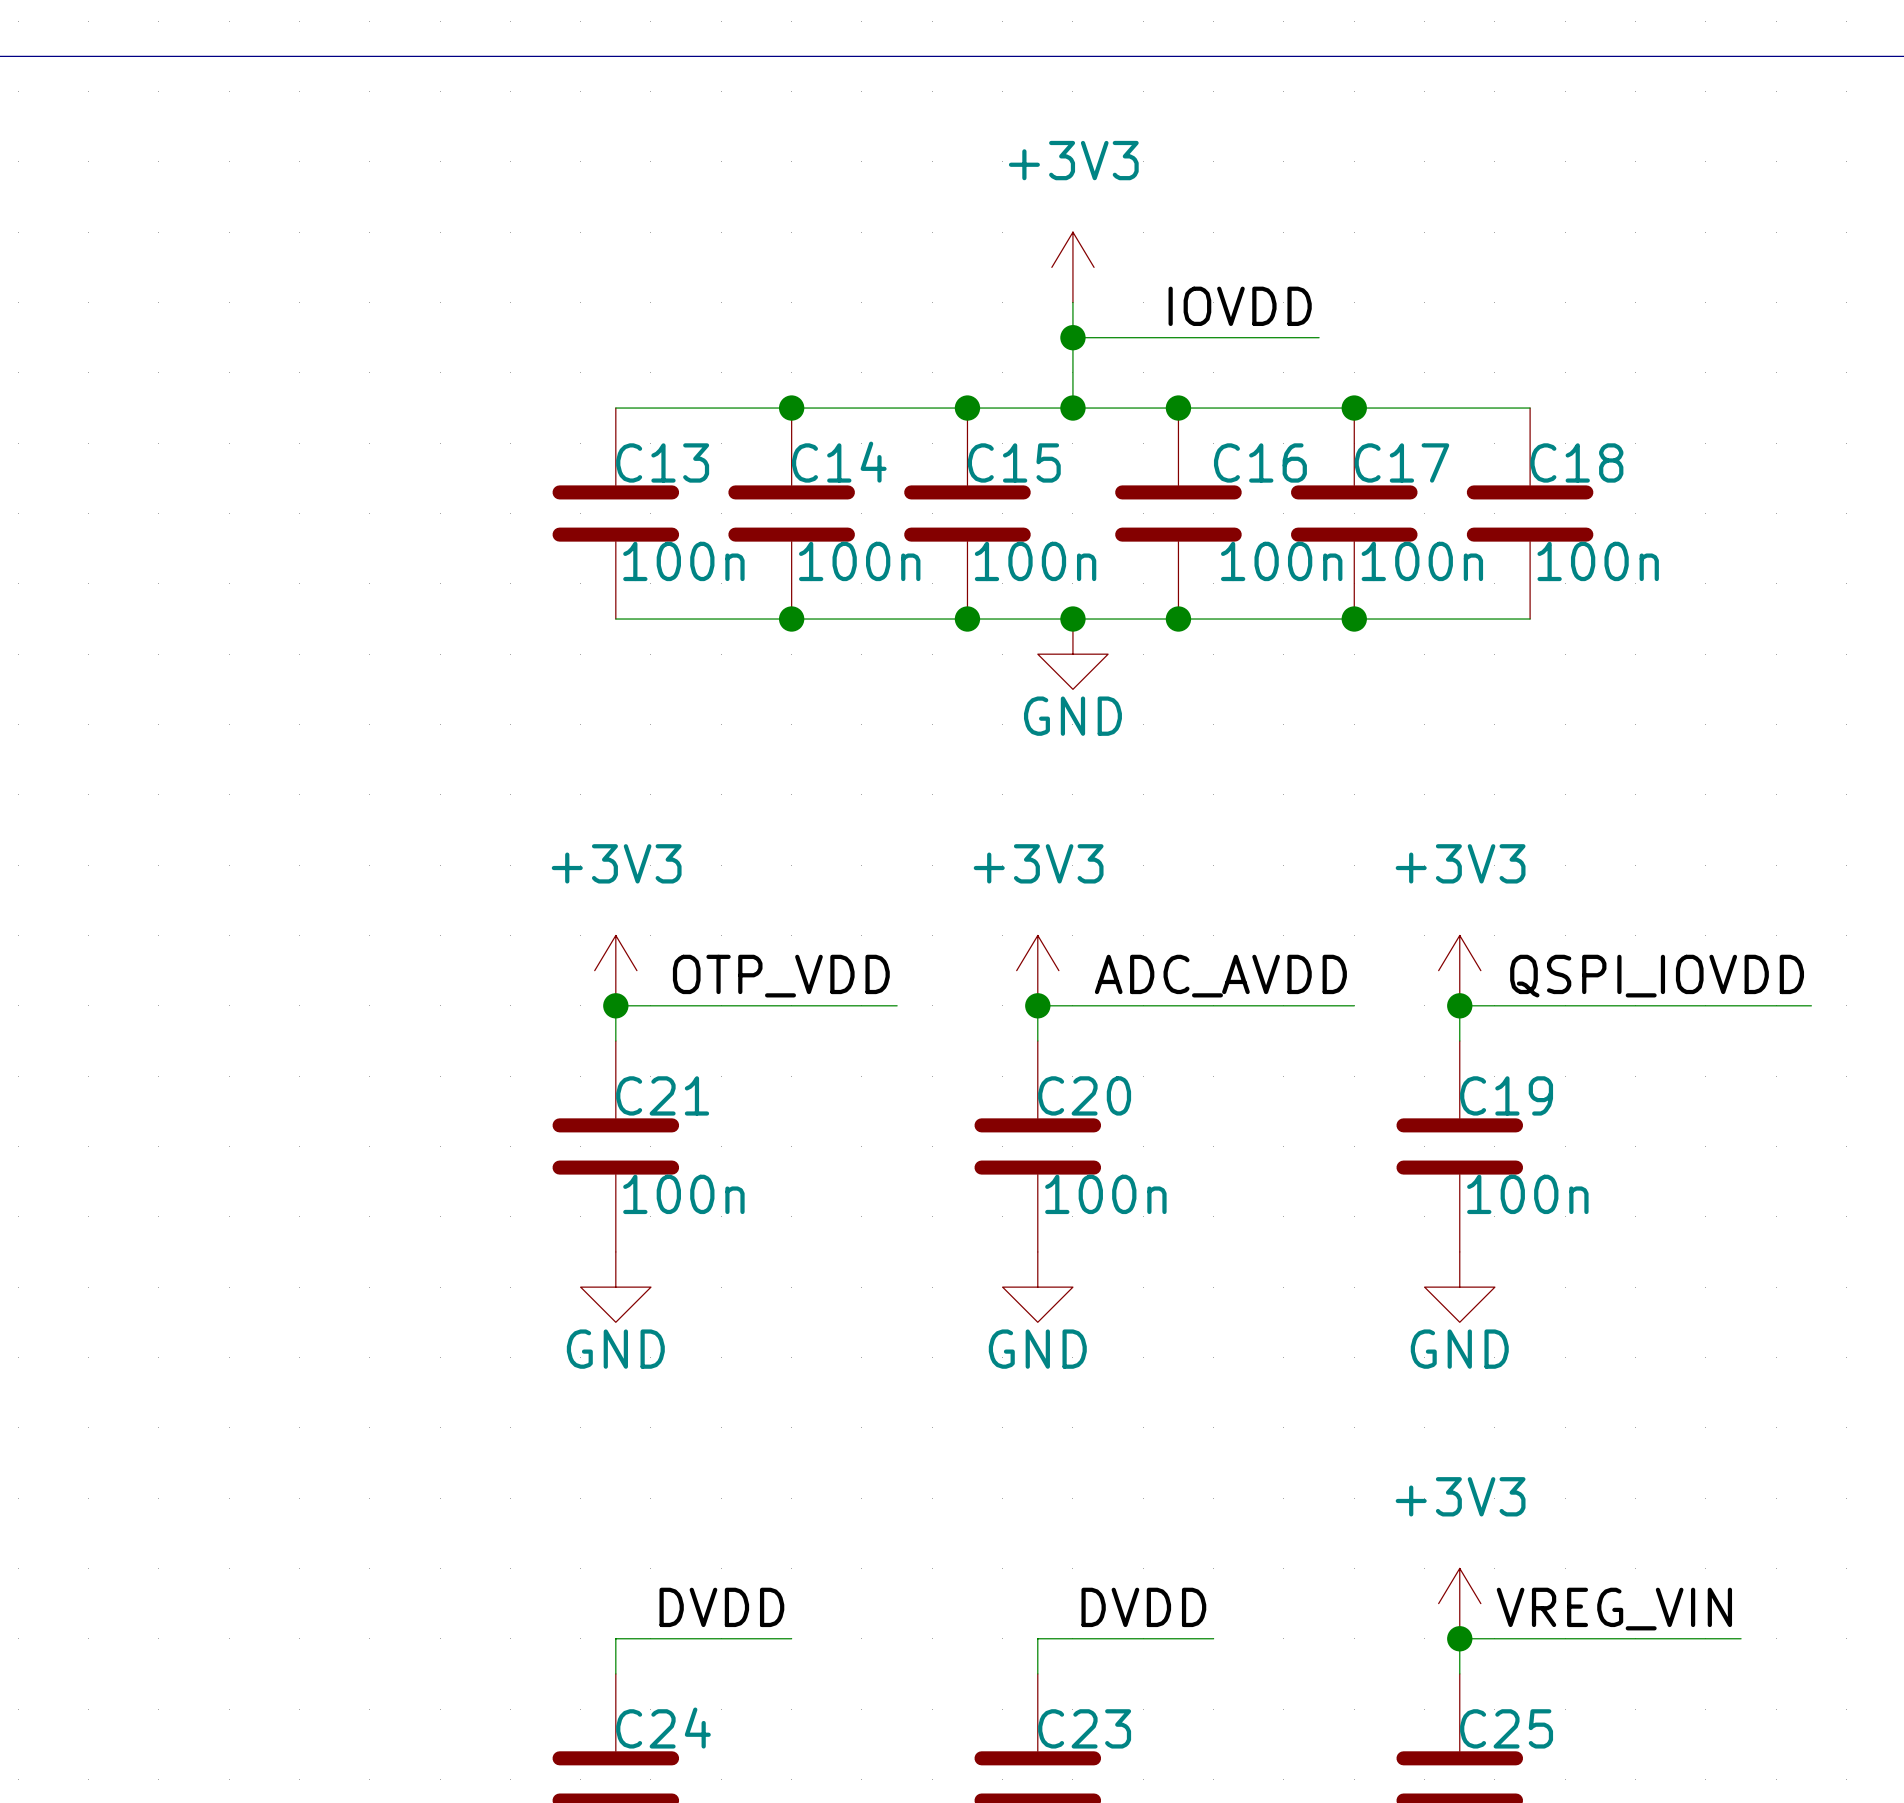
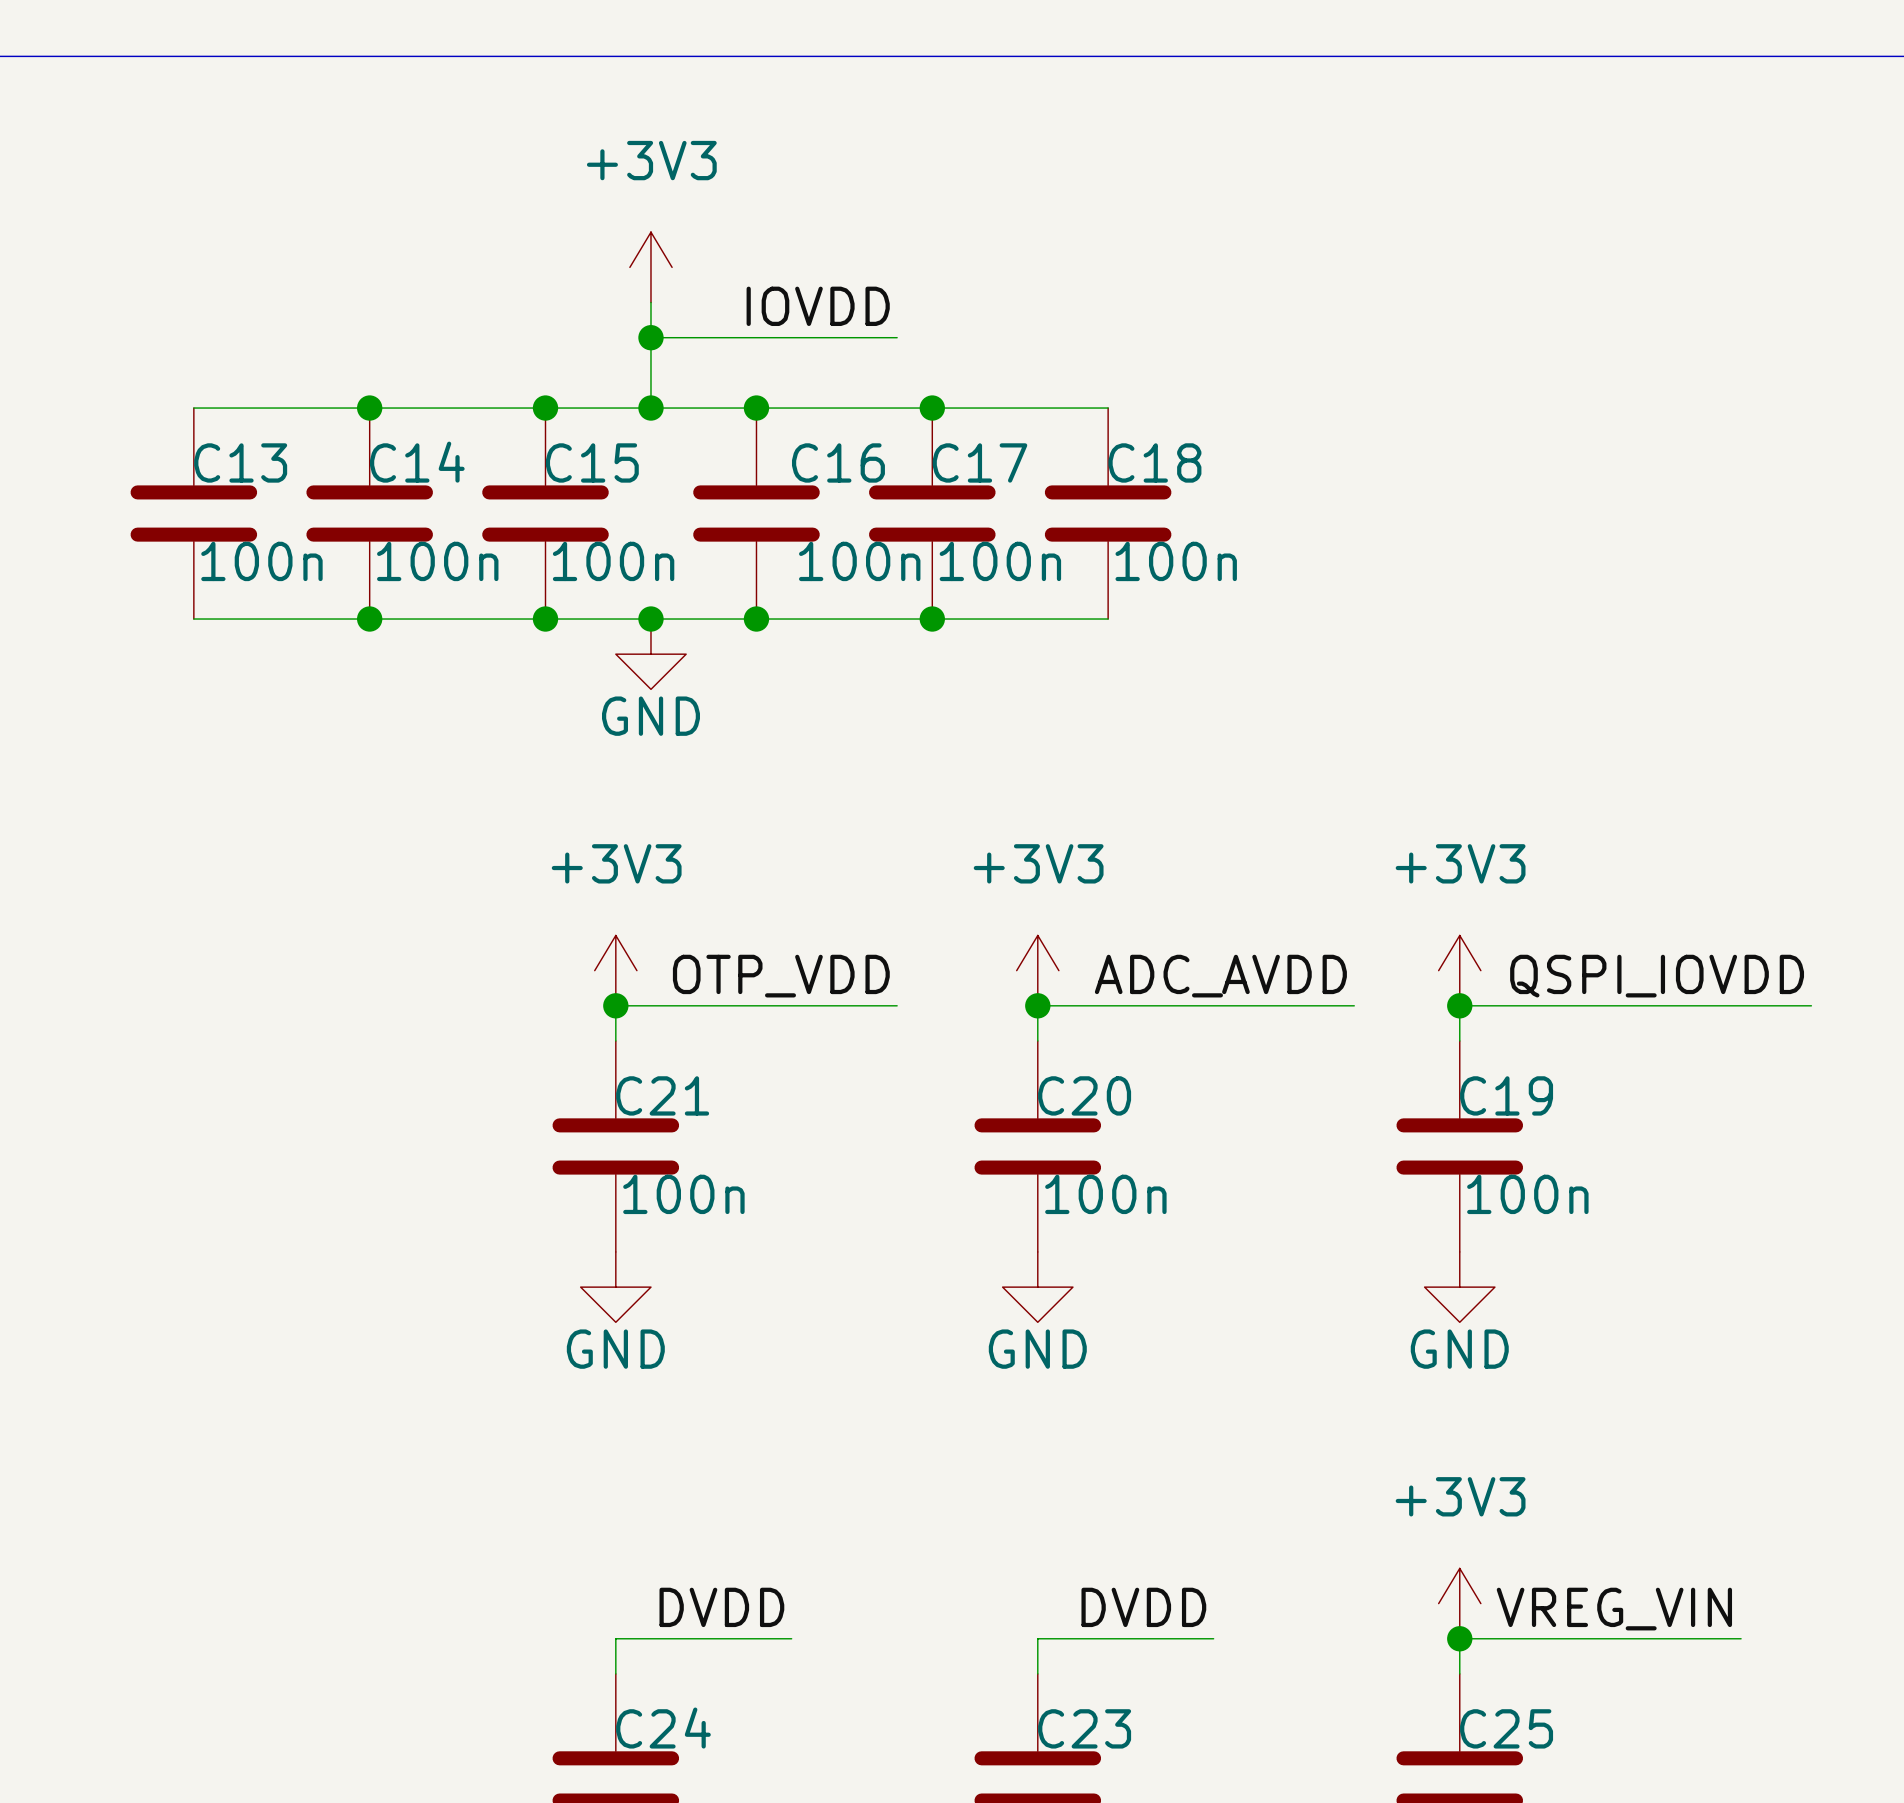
power symbol position: +3V3 (1072, 267) -> +3V3 (650, 267)
wire: (1072, 302) (1072, 408) -> (650, 302) (650, 408)
label position: IOVDD (1240, 306) -> IOVDD (818, 306)
junction: none -> (650, 337)
wire: (1072, 337) (1319, 337) -> (650, 337) (897, 337)
junction: (1072, 337) -> none
wire: none -> (193, 408) (615, 408)
junction: none -> (369, 408)
junction: none -> (545, 408)
junction: none -> (650, 408)
junction position: (791, 408) -> (756, 408)
junction position: (967, 408) -> (932, 408)
junction: (1072, 408) -> none
wire: (1108, 408) (1530, 408) -> none
junction: (1178, 408) -> none
junction: (1354, 408) -> none
C13 position: (615, 513) -> (193, 513)
C14 position: (791, 513) -> (369, 513)
C15 position: (967, 513) -> (545, 513)
C16 position: (1178, 513) -> (756, 513)
C17 position: (1354, 513) -> (932, 513)
C18 position: (1530, 513) -> (1108, 513)
wire: none -> (193, 619) (615, 619)
junction: none -> (369, 619)
junction: none -> (545, 619)
junction: none -> (650, 619)
junction position: (791, 619) -> (756, 619)
junction position: (967, 619) -> (932, 619)
junction: (1072, 619) -> none
wire: (1108, 619) (1530, 619) -> none
junction: (1178, 619) -> none
junction: (1354, 619) -> none
power symbol position: GND (1072, 654) -> GND (650, 654)

